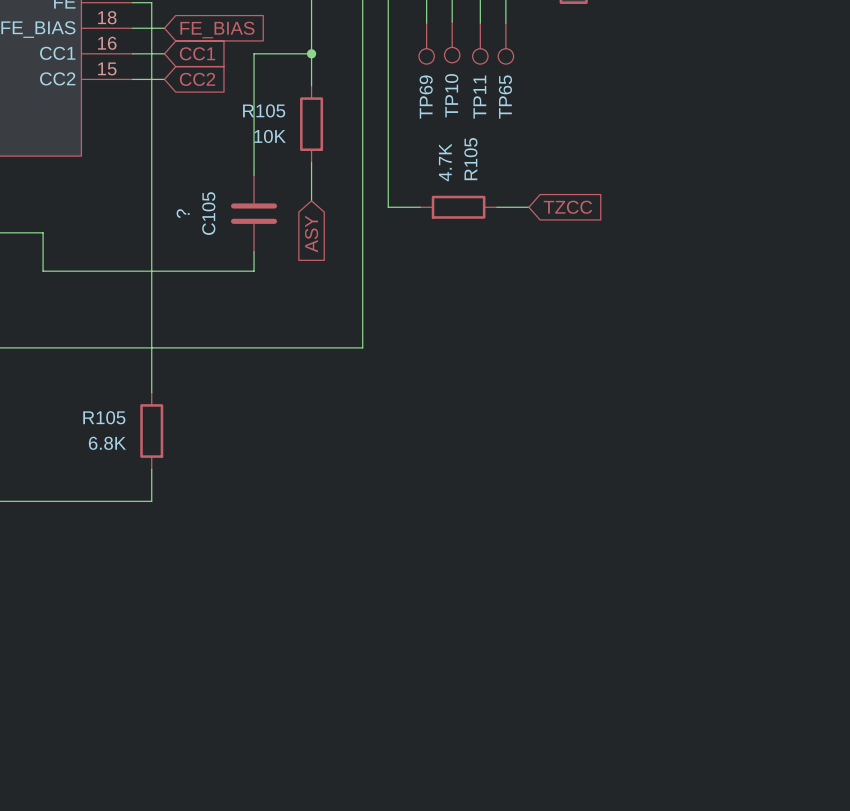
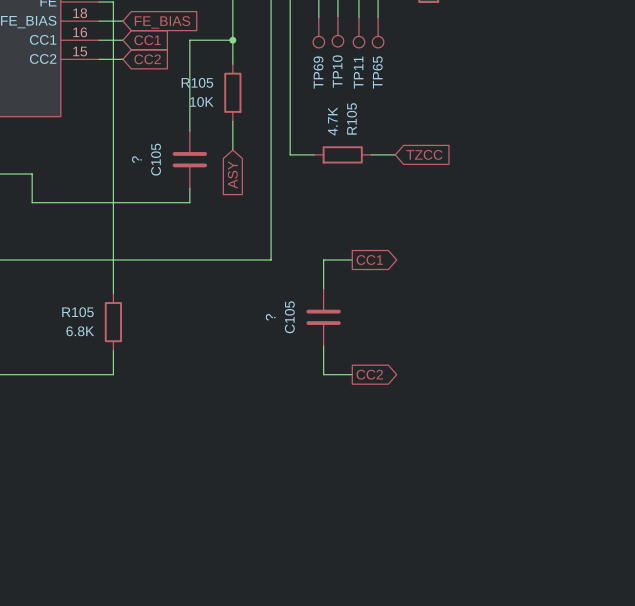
wire: none -> (352, 260) (323, 260) (323, 288)
global label: none -> CC1 (369, 260)
C105: none -> ? (323, 317)
wire: none -> (323, 346) (323, 374) (352, 374)
global label: none -> CC2 (369, 374)

